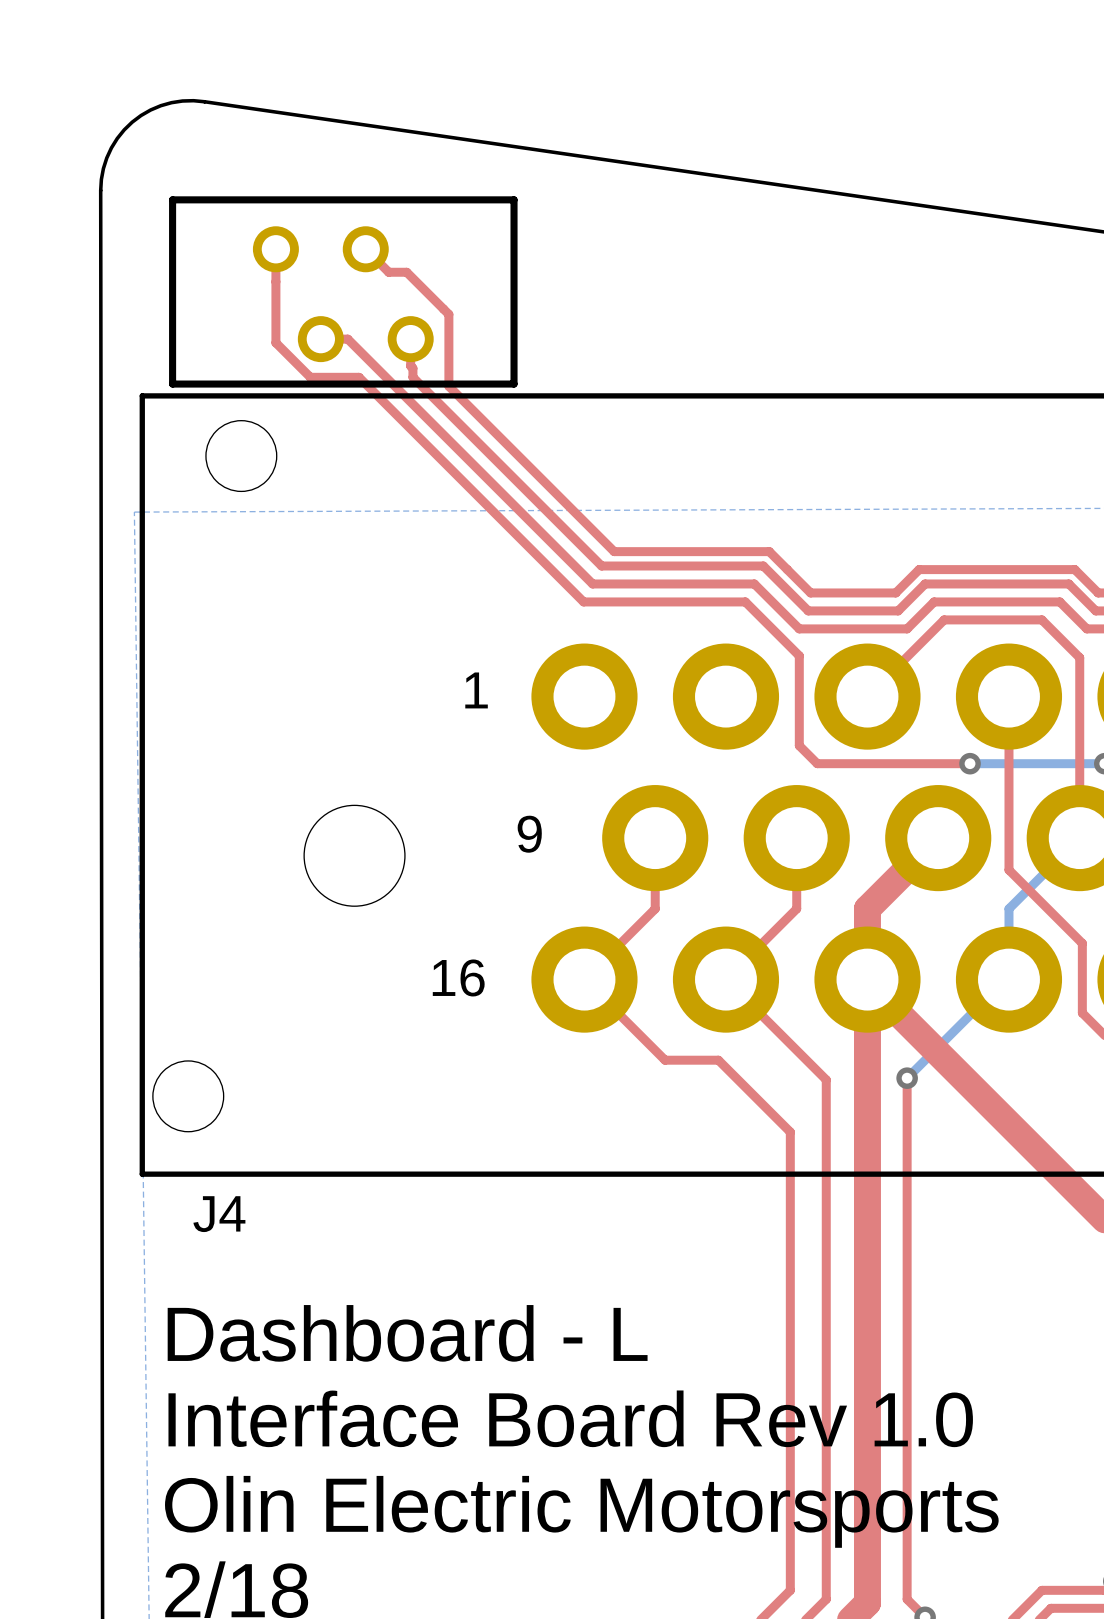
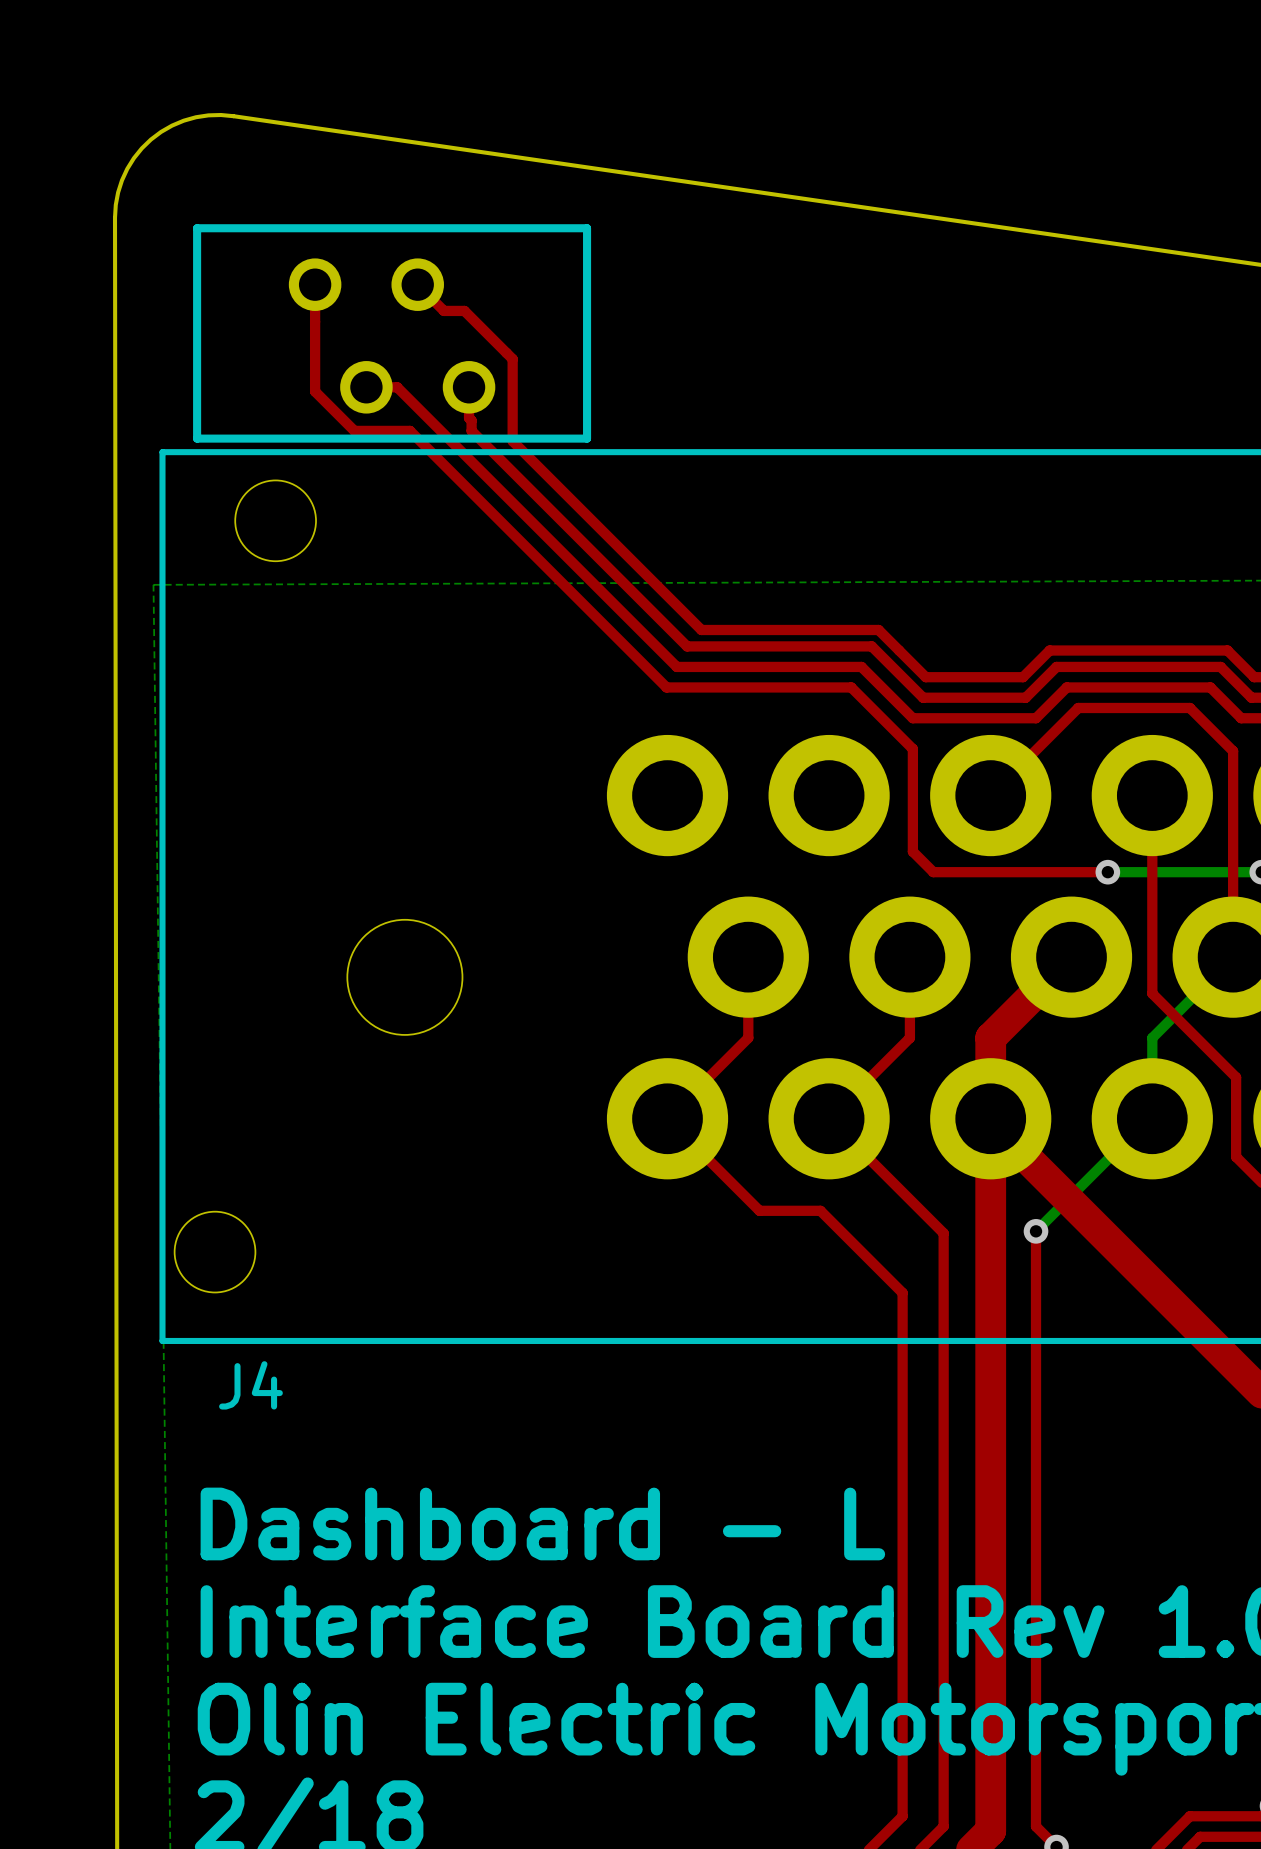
text: 1 (476, 690) -> none
text: 9 (529, 834) -> none
text: 16 (458, 977) -> none

